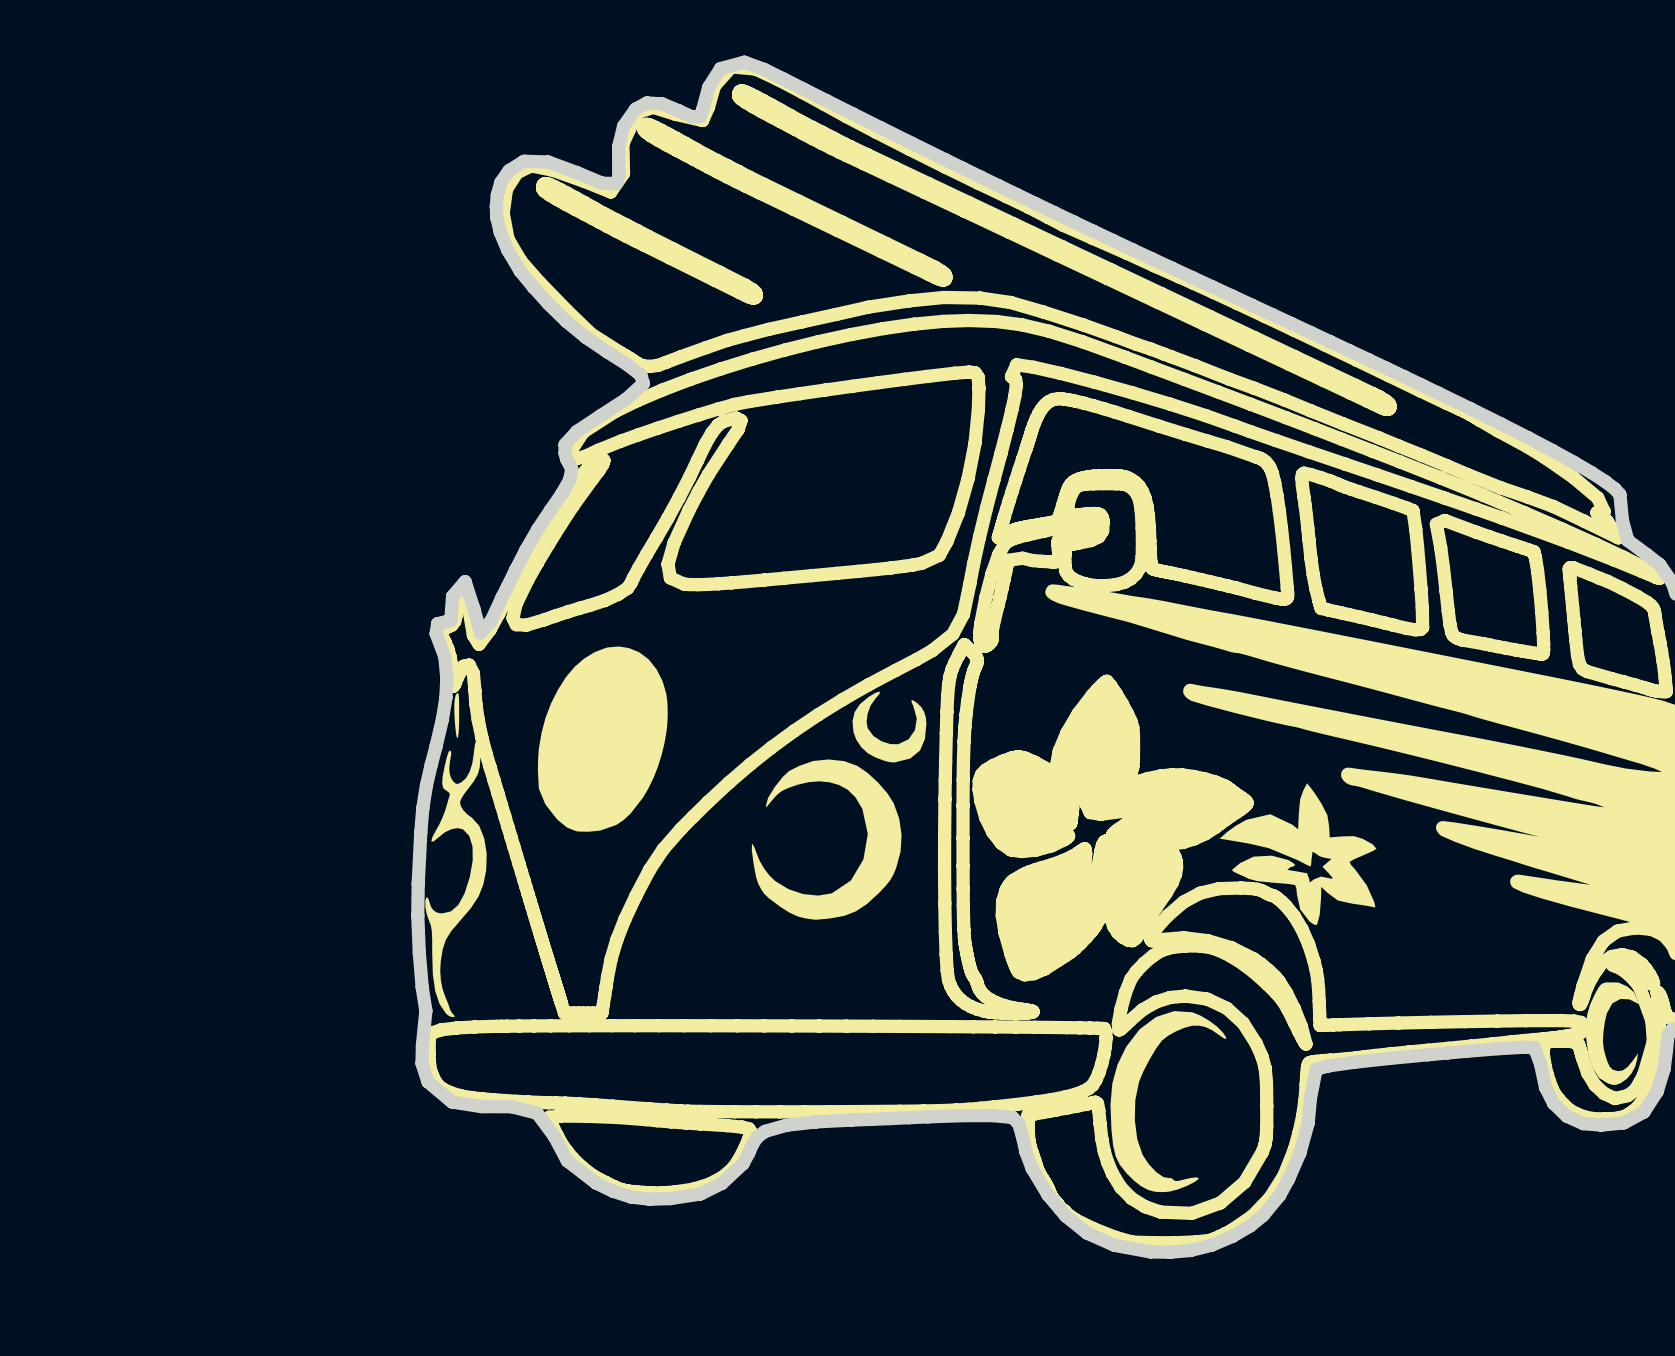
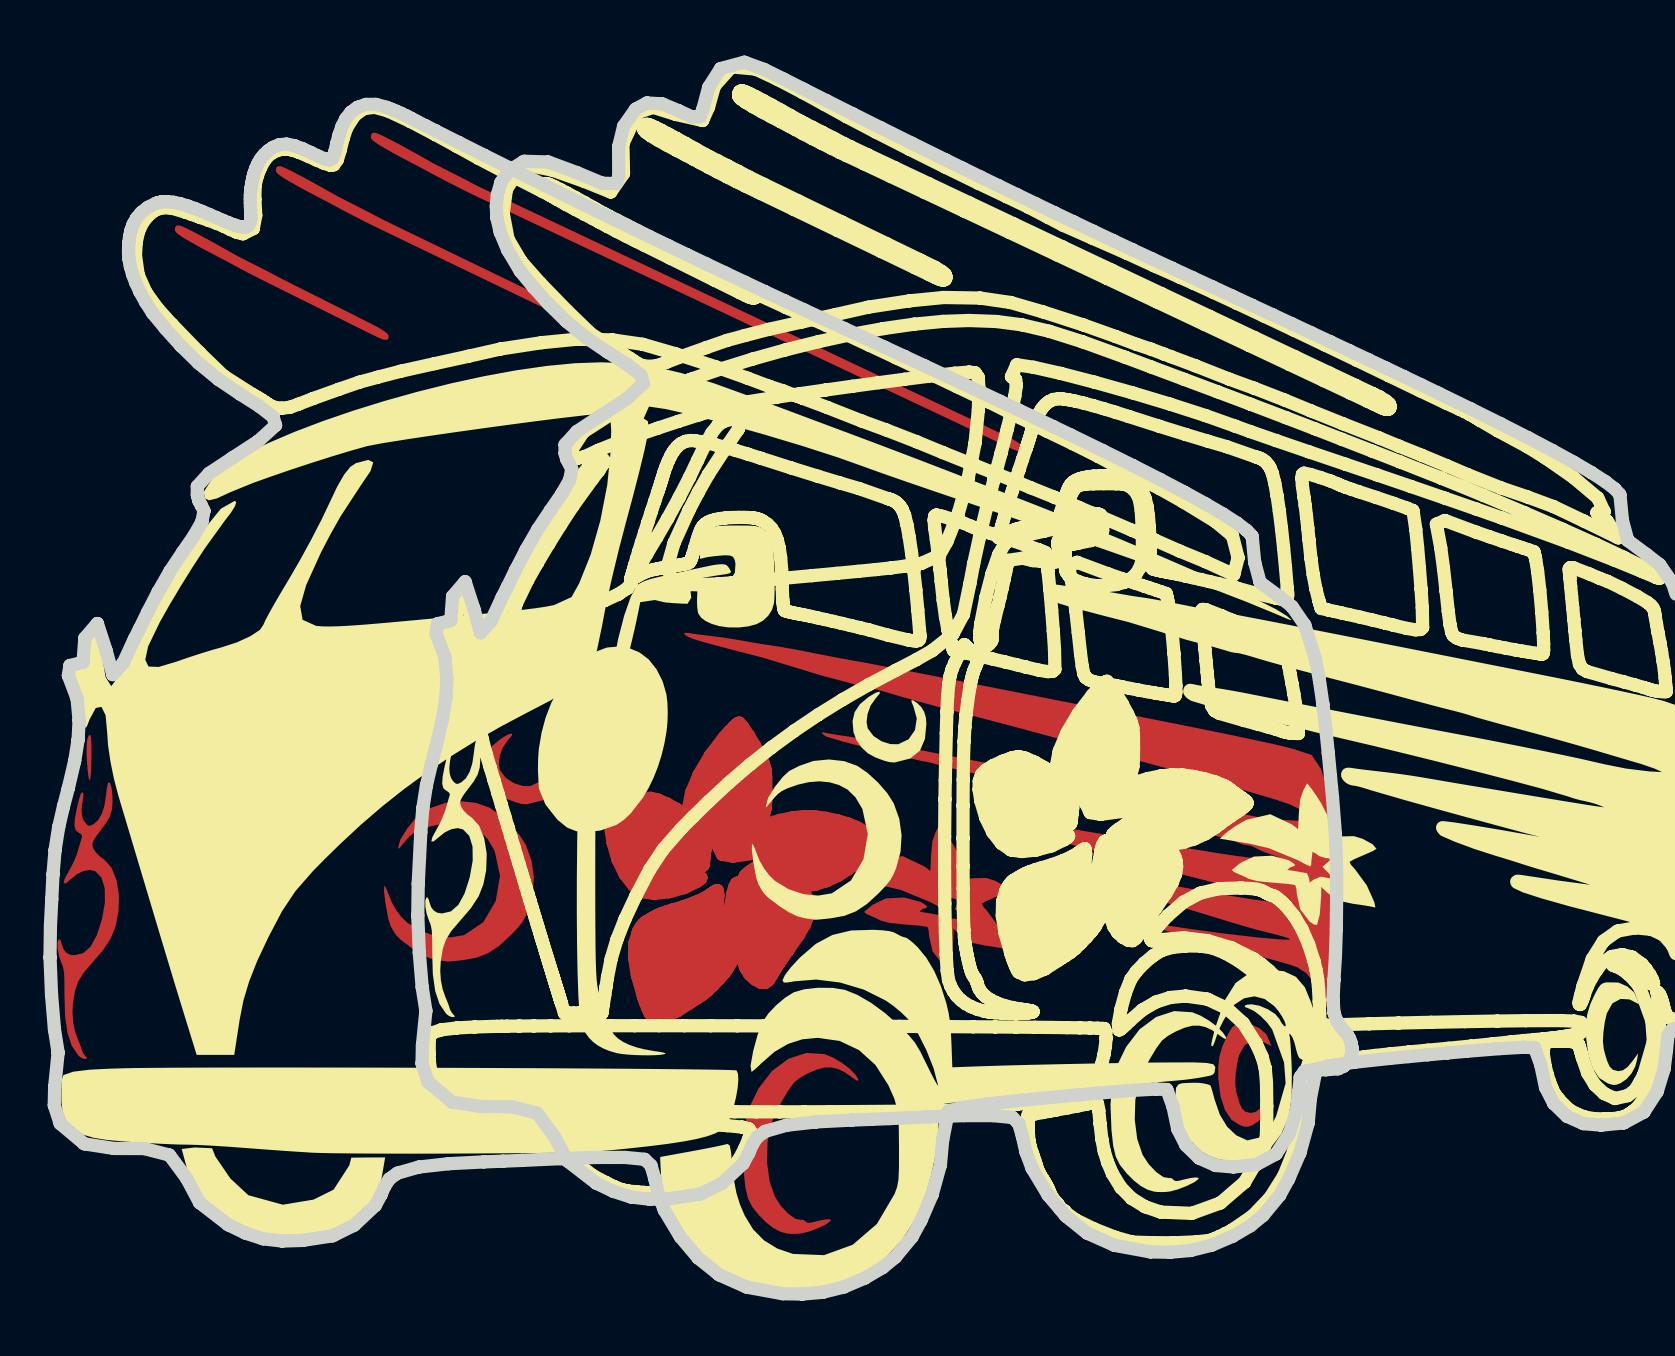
drawing: none -> [43, 97, 1359, 1301]

